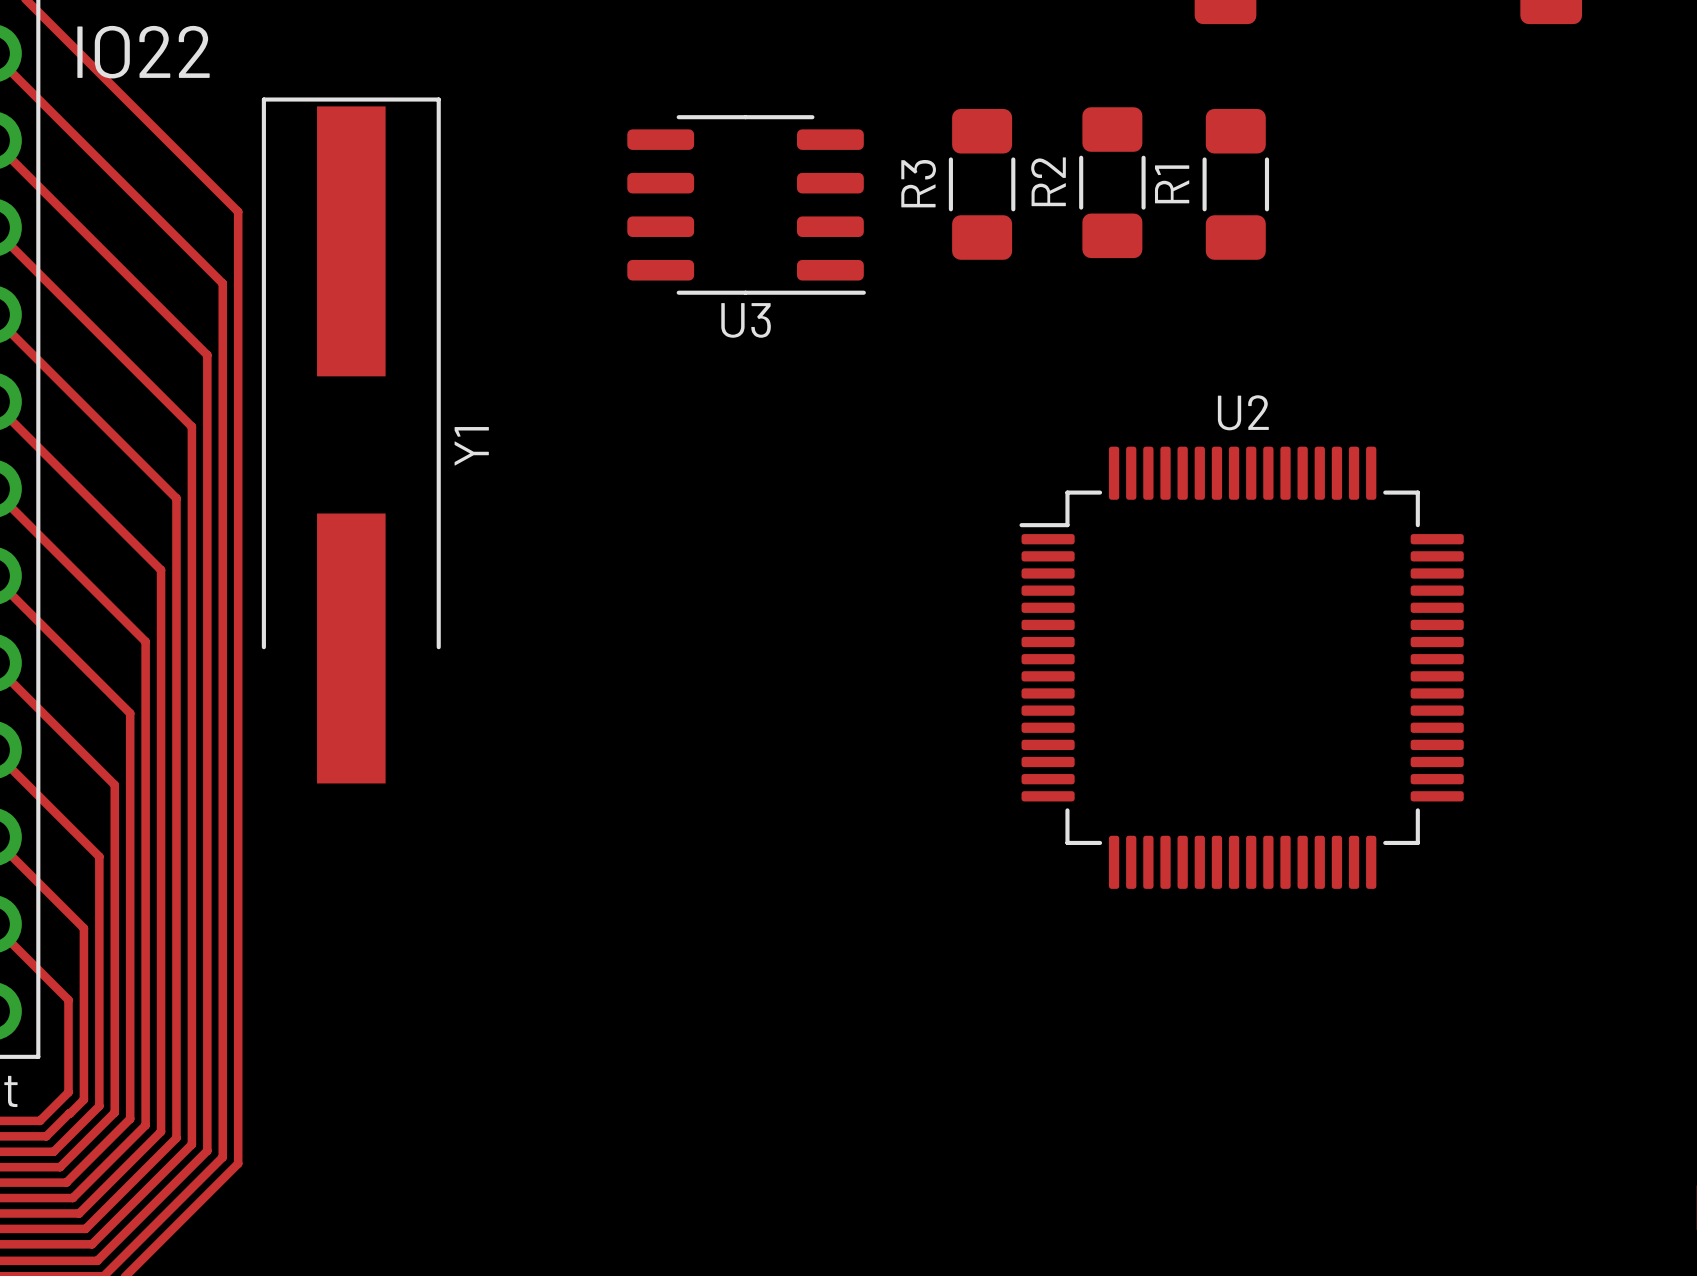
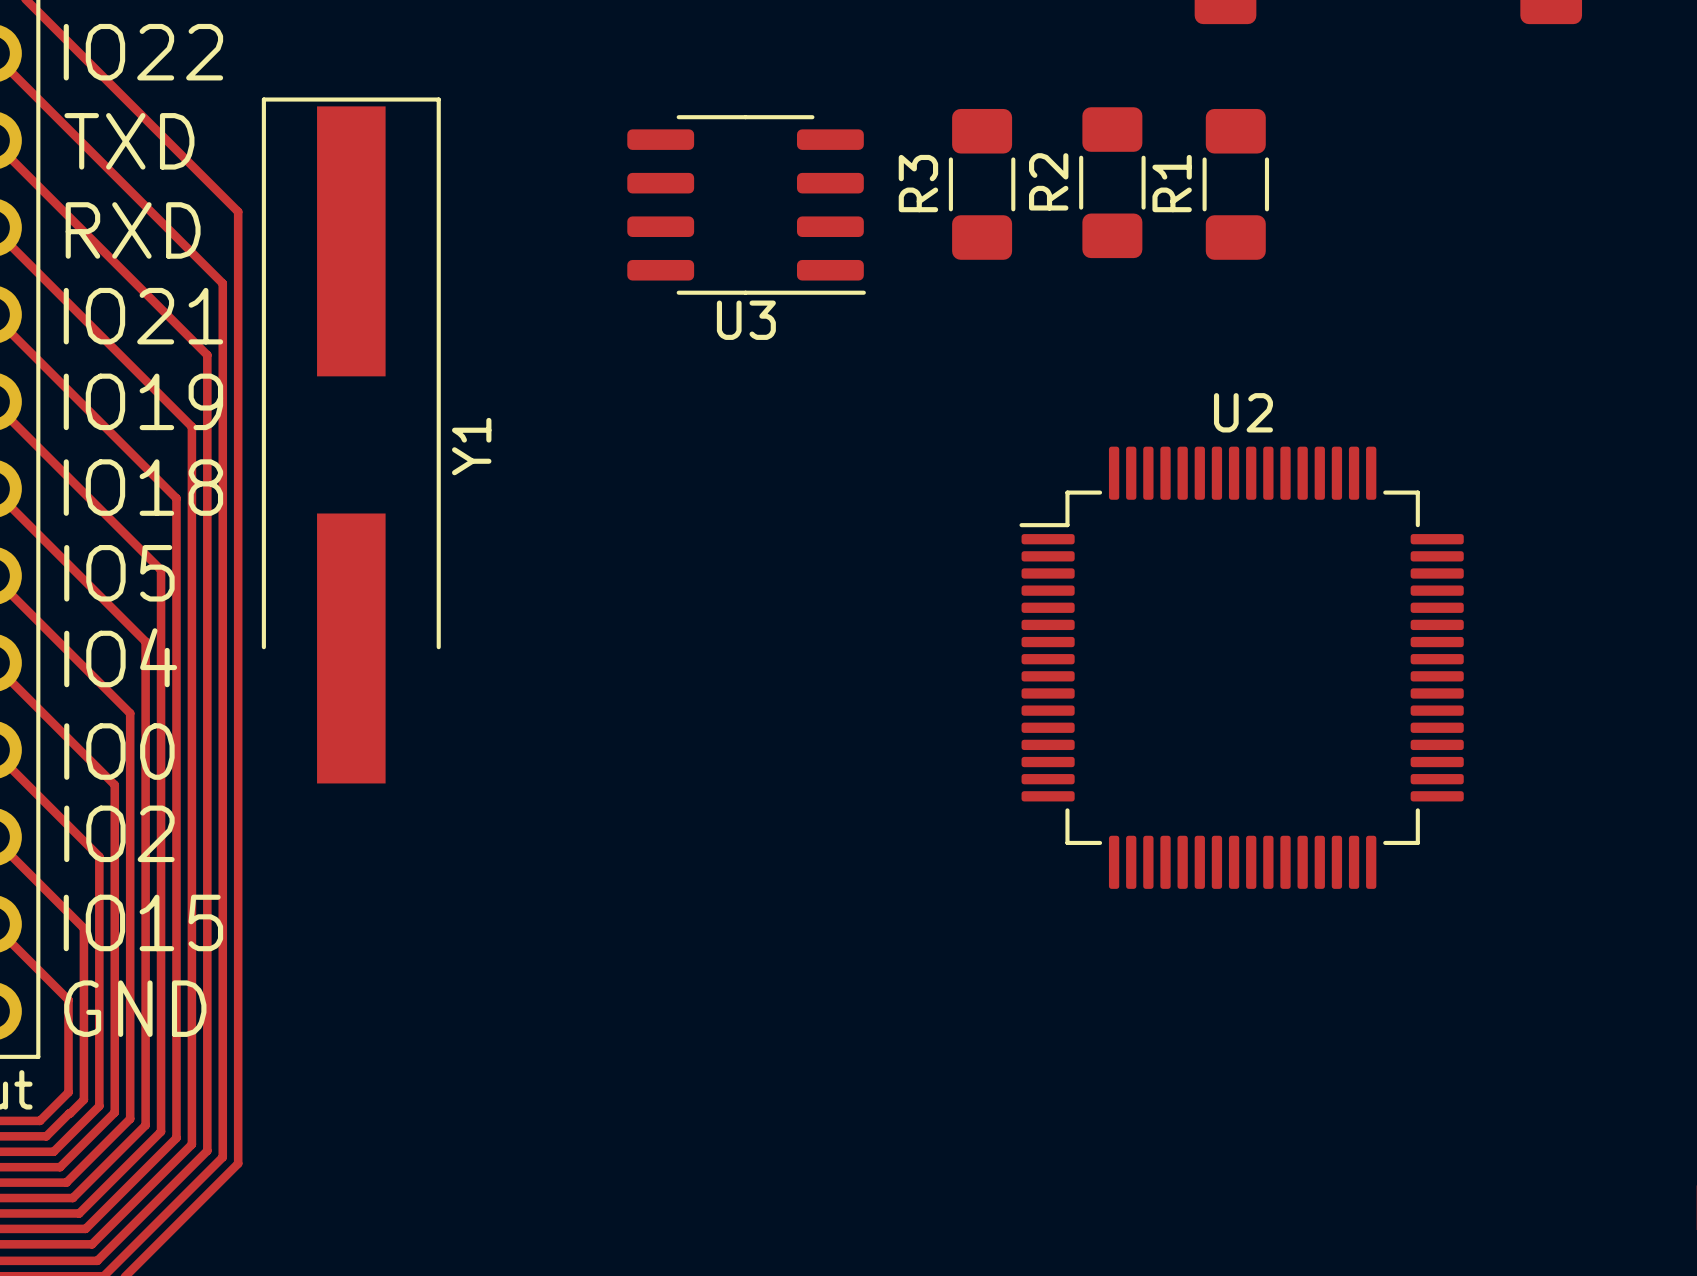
text: none -> TXD (129, 141)
text: none -> RXD (133, 230)
text: none -> IO21 (143, 316)
text: none -> IO19 (143, 401)
text: none -> IO18 (143, 487)
text: none -> IO5 (119, 573)
text: none -> IO4 (120, 657)
text: none -> IO0 (119, 751)
text: none -> IO2 (119, 833)
text: none -> IO15 (143, 922)
text: none -> GND (135, 1008)

